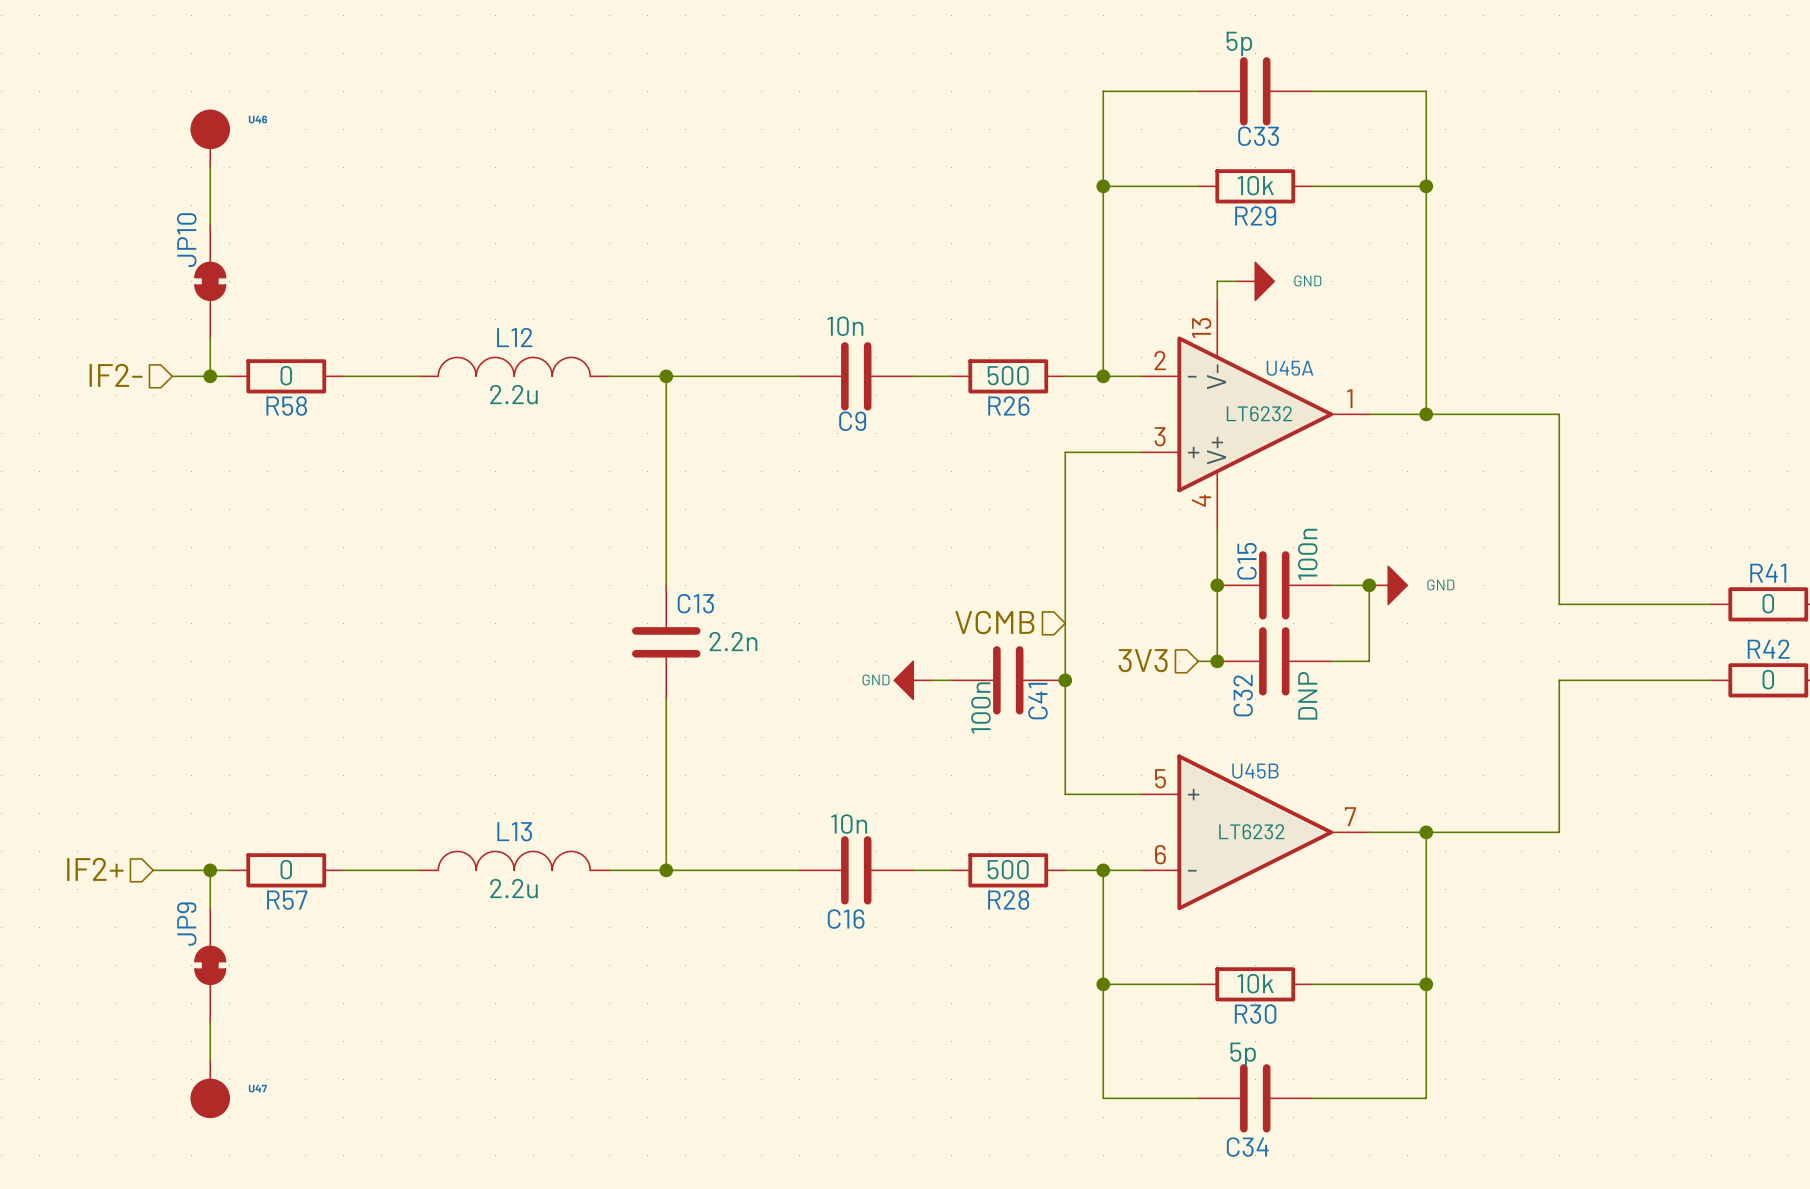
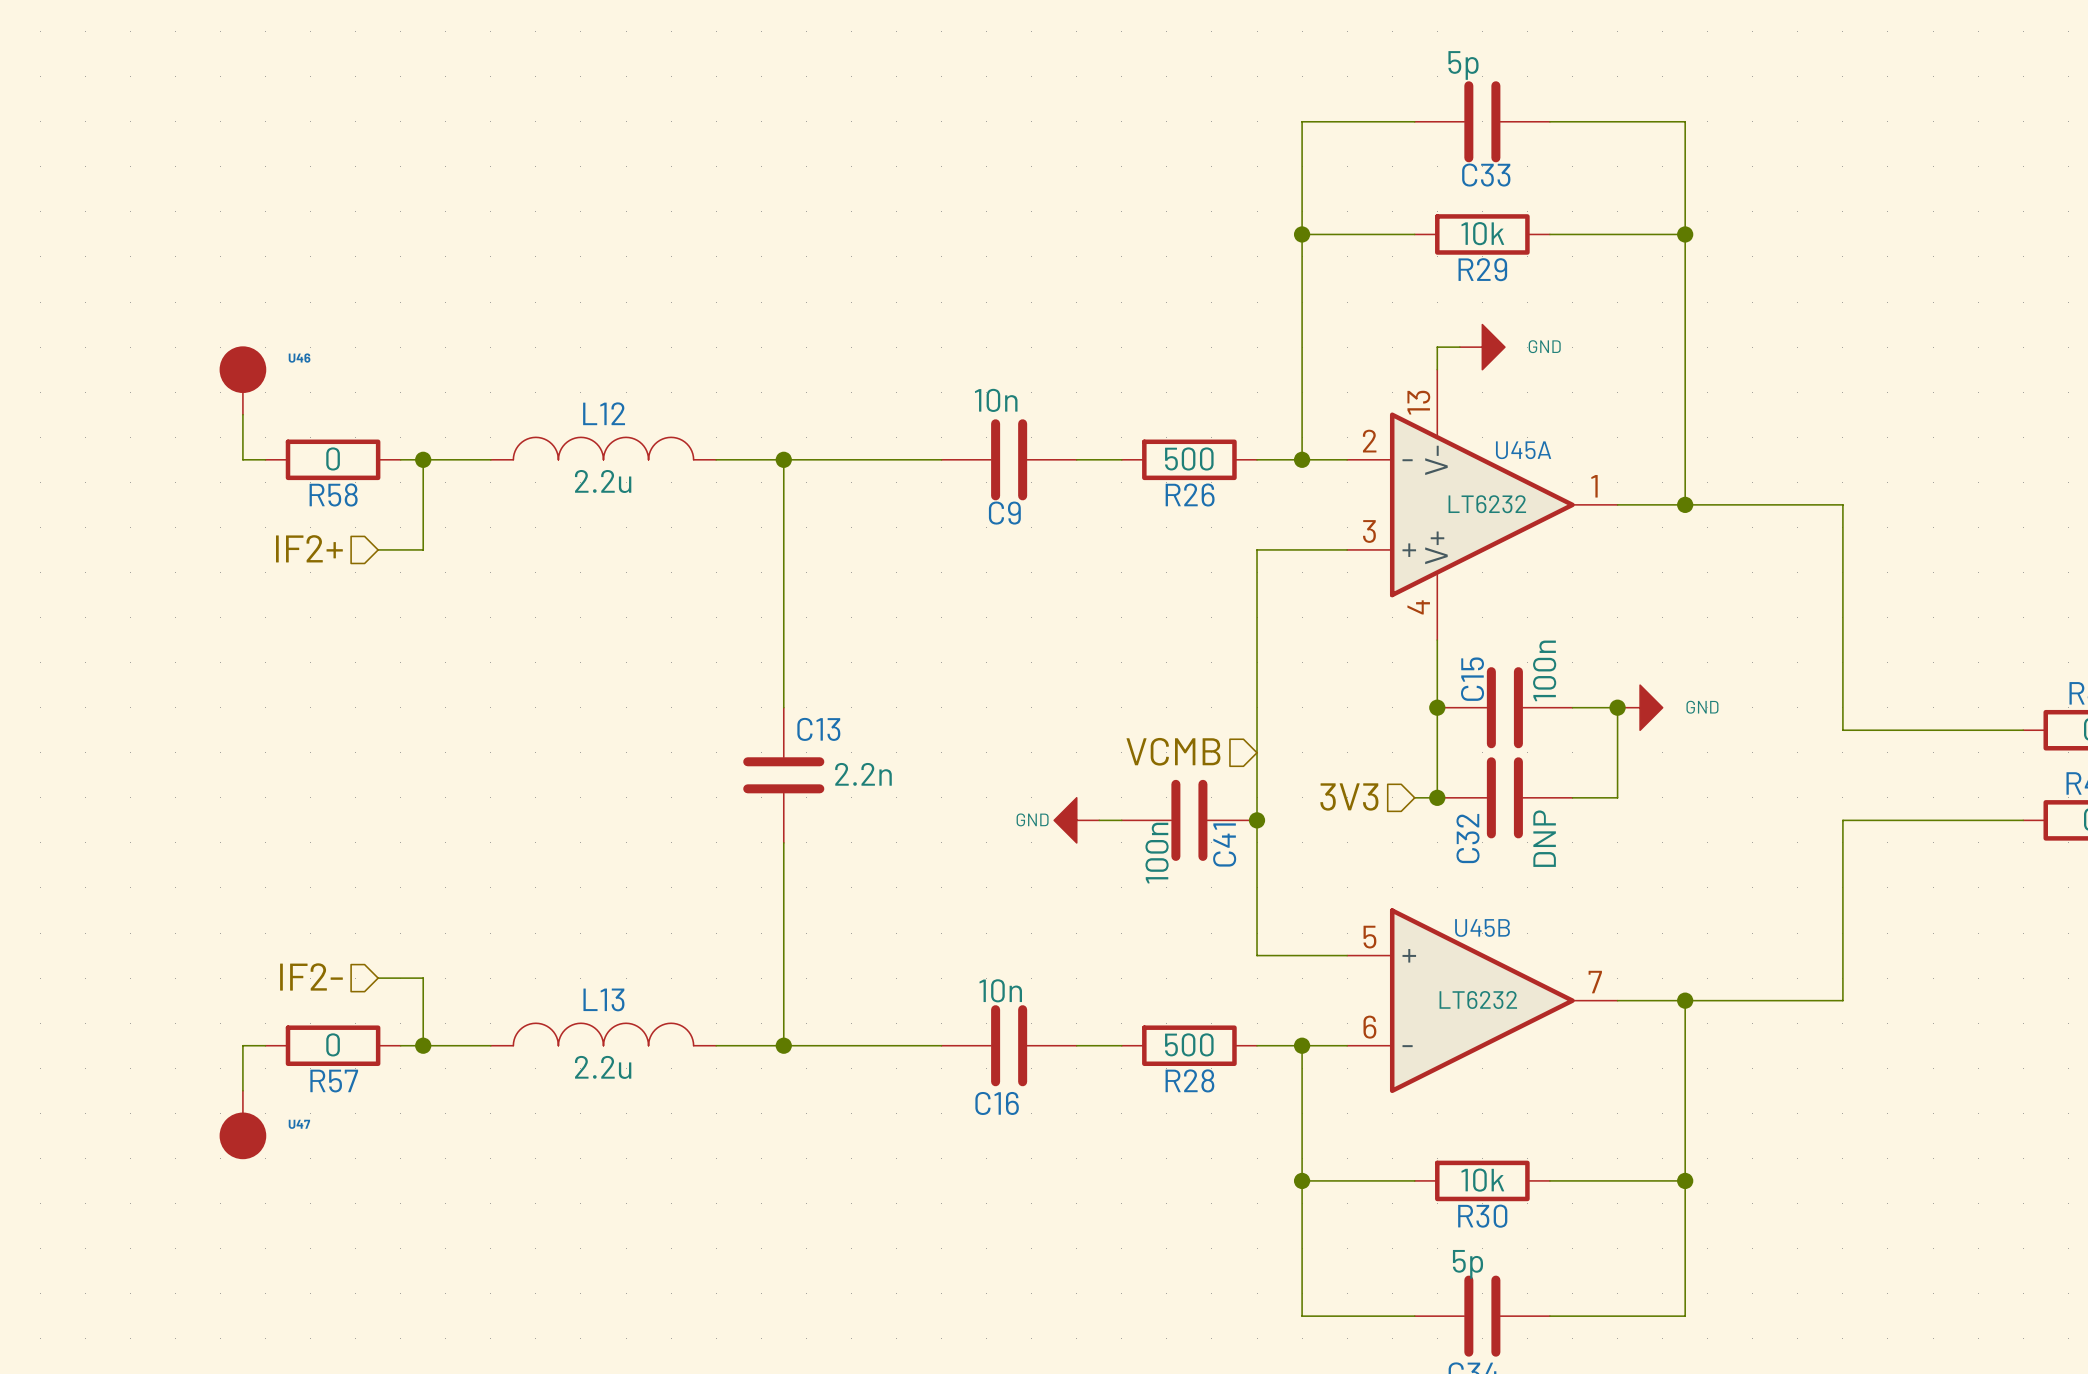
U46 position: (210, 138) -> (242, 380)
wire: (210, 167) (210, 224) -> none
JP10: (210, 281) -> none
hierarchical label: IF2- (116, 375) -> none
wire: (172, 376) (210, 376) -> none
junction: (210, 376) -> none
wire: none -> (423, 459) (423, 549) (378, 549)
junction: none -> (423, 459)
hierarchical label: none -> IF2+ (309, 548)
hierarchical label: none -> IF2- (311, 976)
wire: none -> (378, 978) (423, 978) (423, 1045)
hierarchical label: IF2+ (95, 869) -> none
wire: (153, 870) (210, 870) -> none
junction: (210, 870) -> none
junction: none -> (423, 1045)
JP9: (210, 965) -> none
wire: (210, 1022) (210, 1060) -> none
U47 position: (210, 1088) -> (242, 1124)

